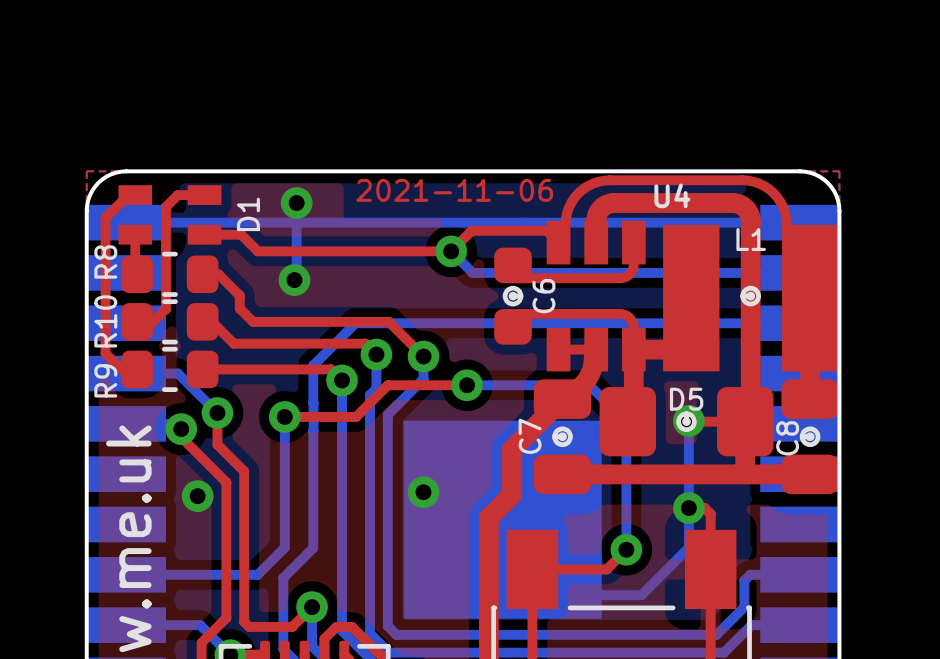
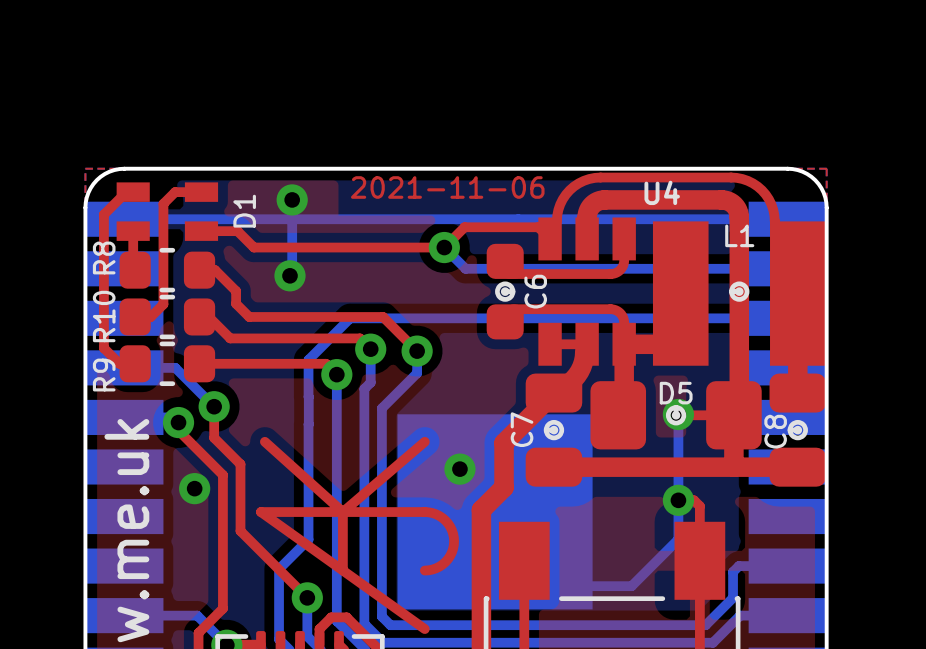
top track: (467, 385) (387, 385) (356, 416) (284, 416) -> none
bottom track: (467, 385) (589, 385) (626, 422) (626, 549) -> none
via: (467, 385) -> none
bottom track: (284, 416) (284, 547) (257, 574) (126, 574) -> none
via: (284, 416) -> none
drawing: none -> [256, 436, 459, 634]
via: none -> (459, 469)
via: (423, 492) -> none
top track: (244, 539) (244, 621) (249, 626) (292, 626) (312, 607) -> (240, 531) (307, 597)
top track: (626, 549) (606, 569) (532, 569) -> none
via: (626, 549) -> none

